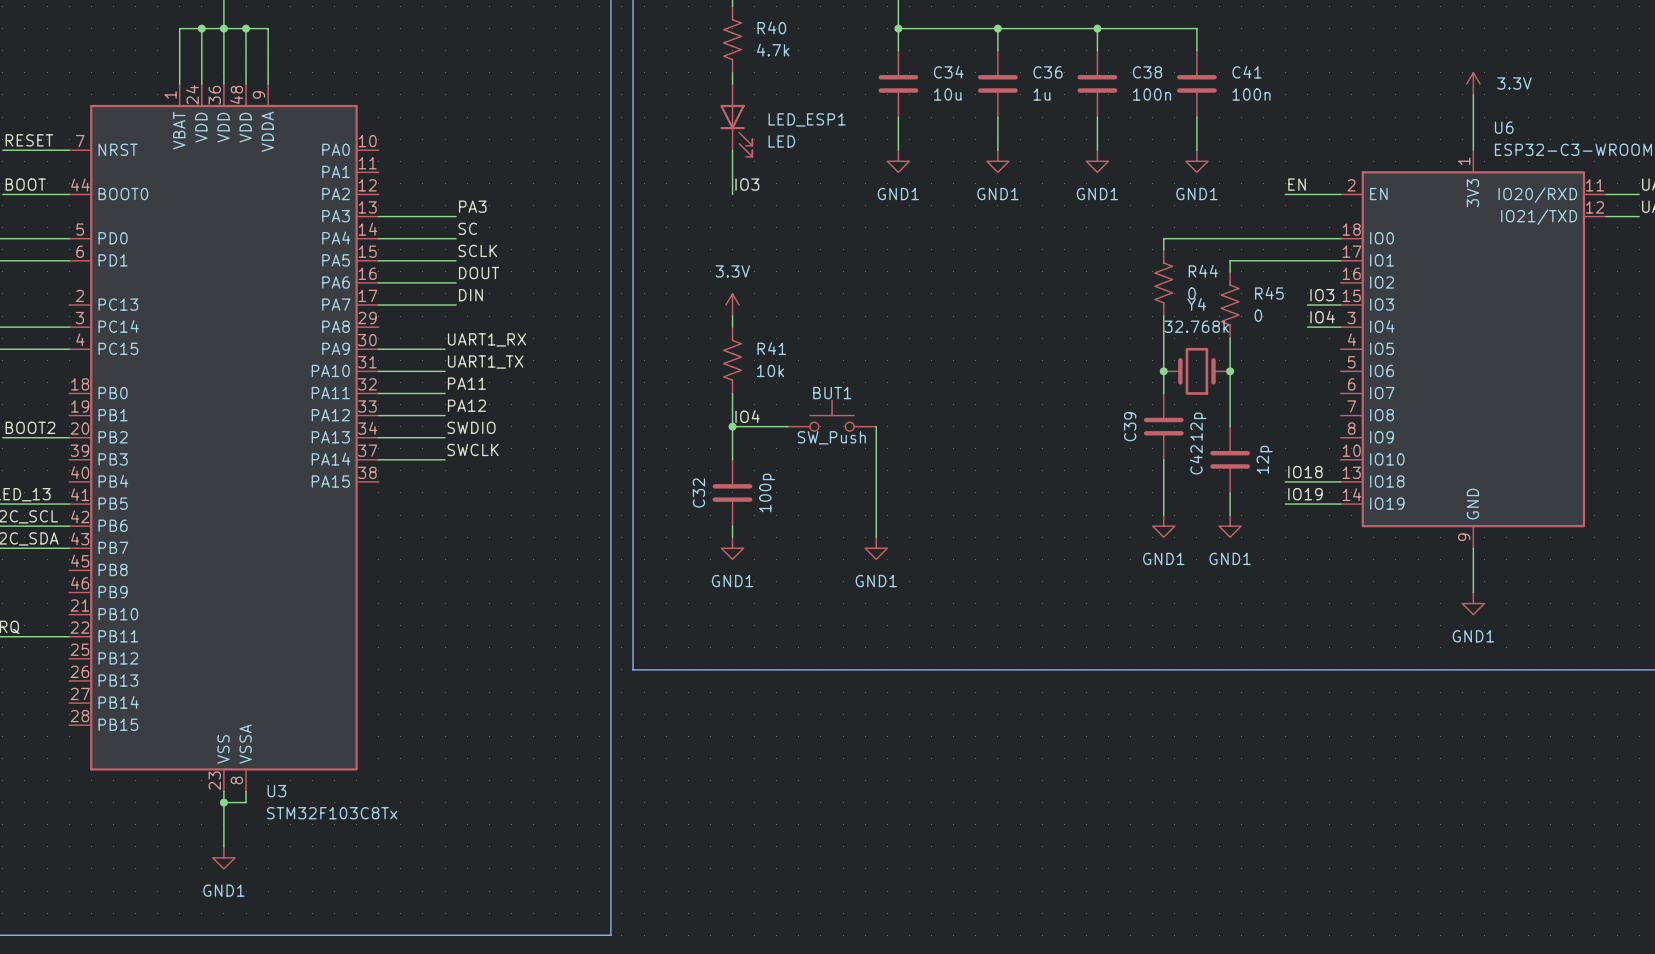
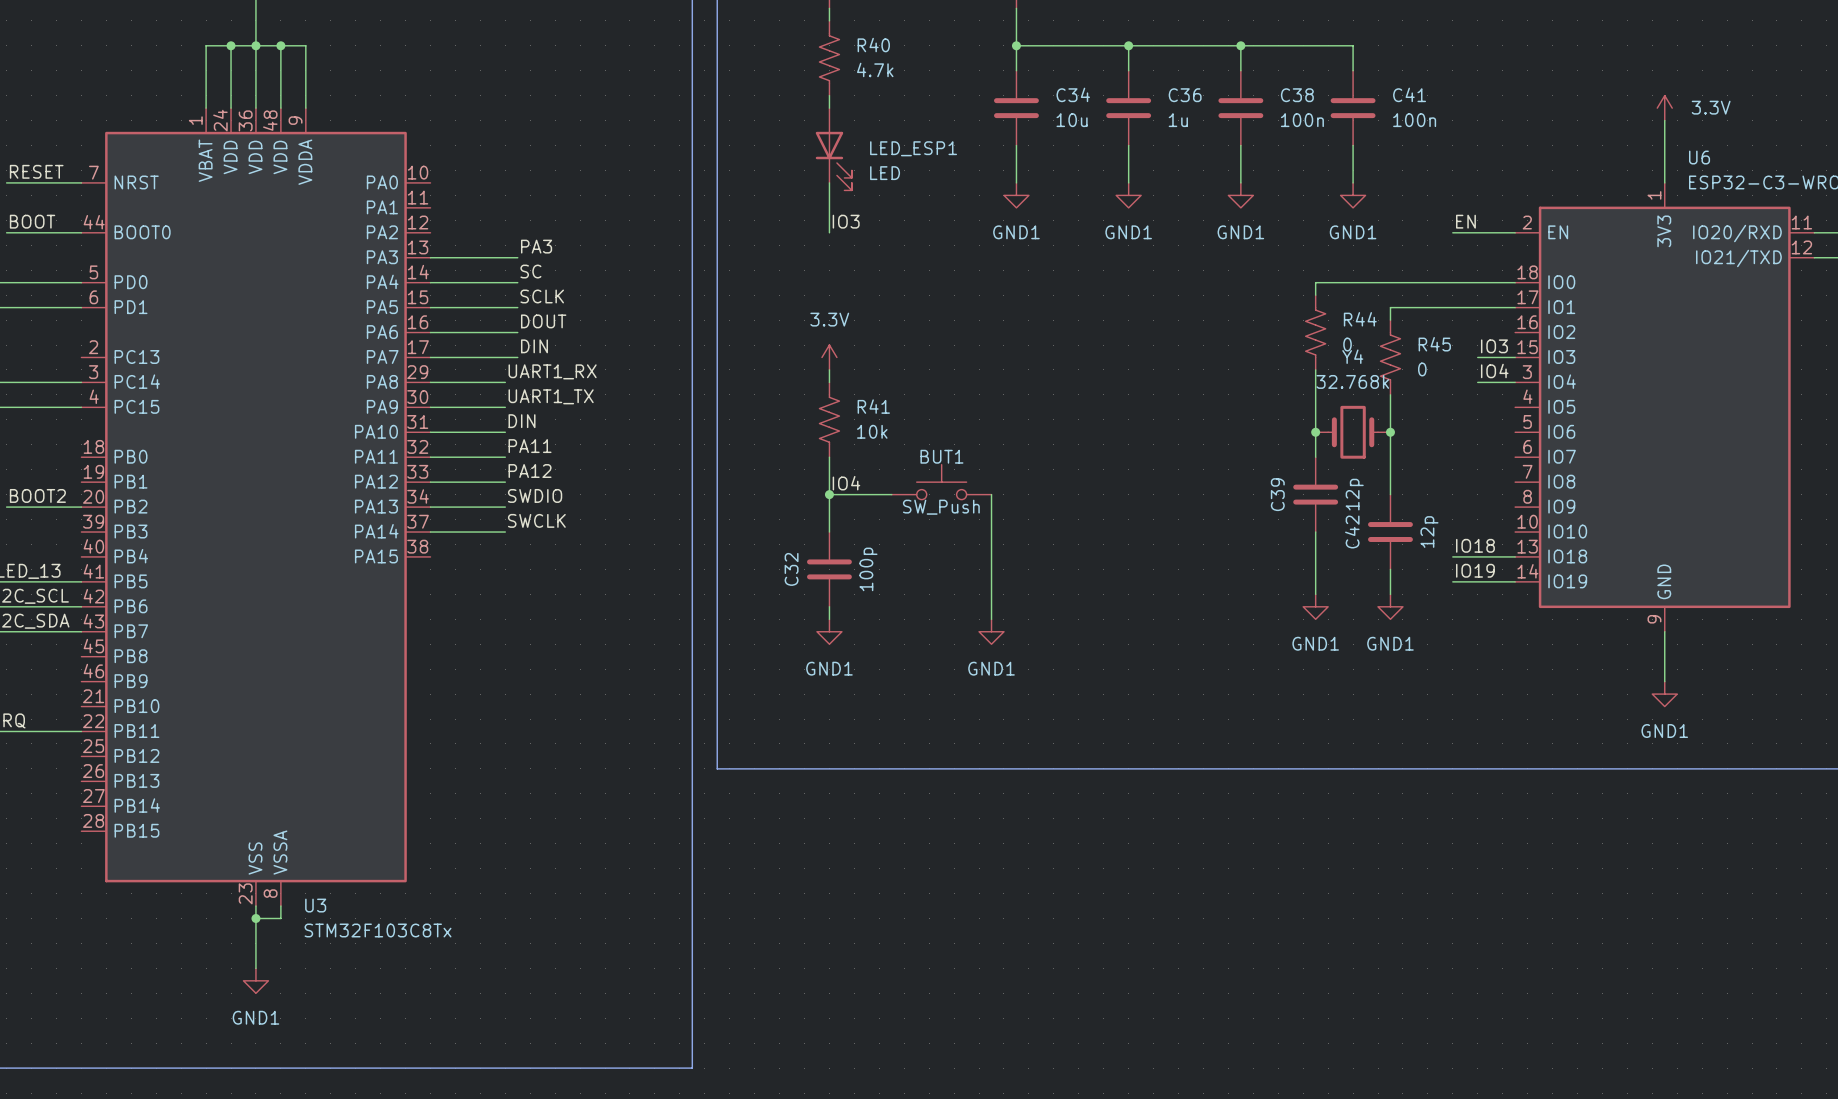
label: none -> UART1_RX (552, 371)
wire: none -> (430, 382) (505, 382)
label: UART1_RX (486, 339) -> UART1_TX (551, 396)
label: UART1_TX (485, 362) -> DIN (522, 421)

